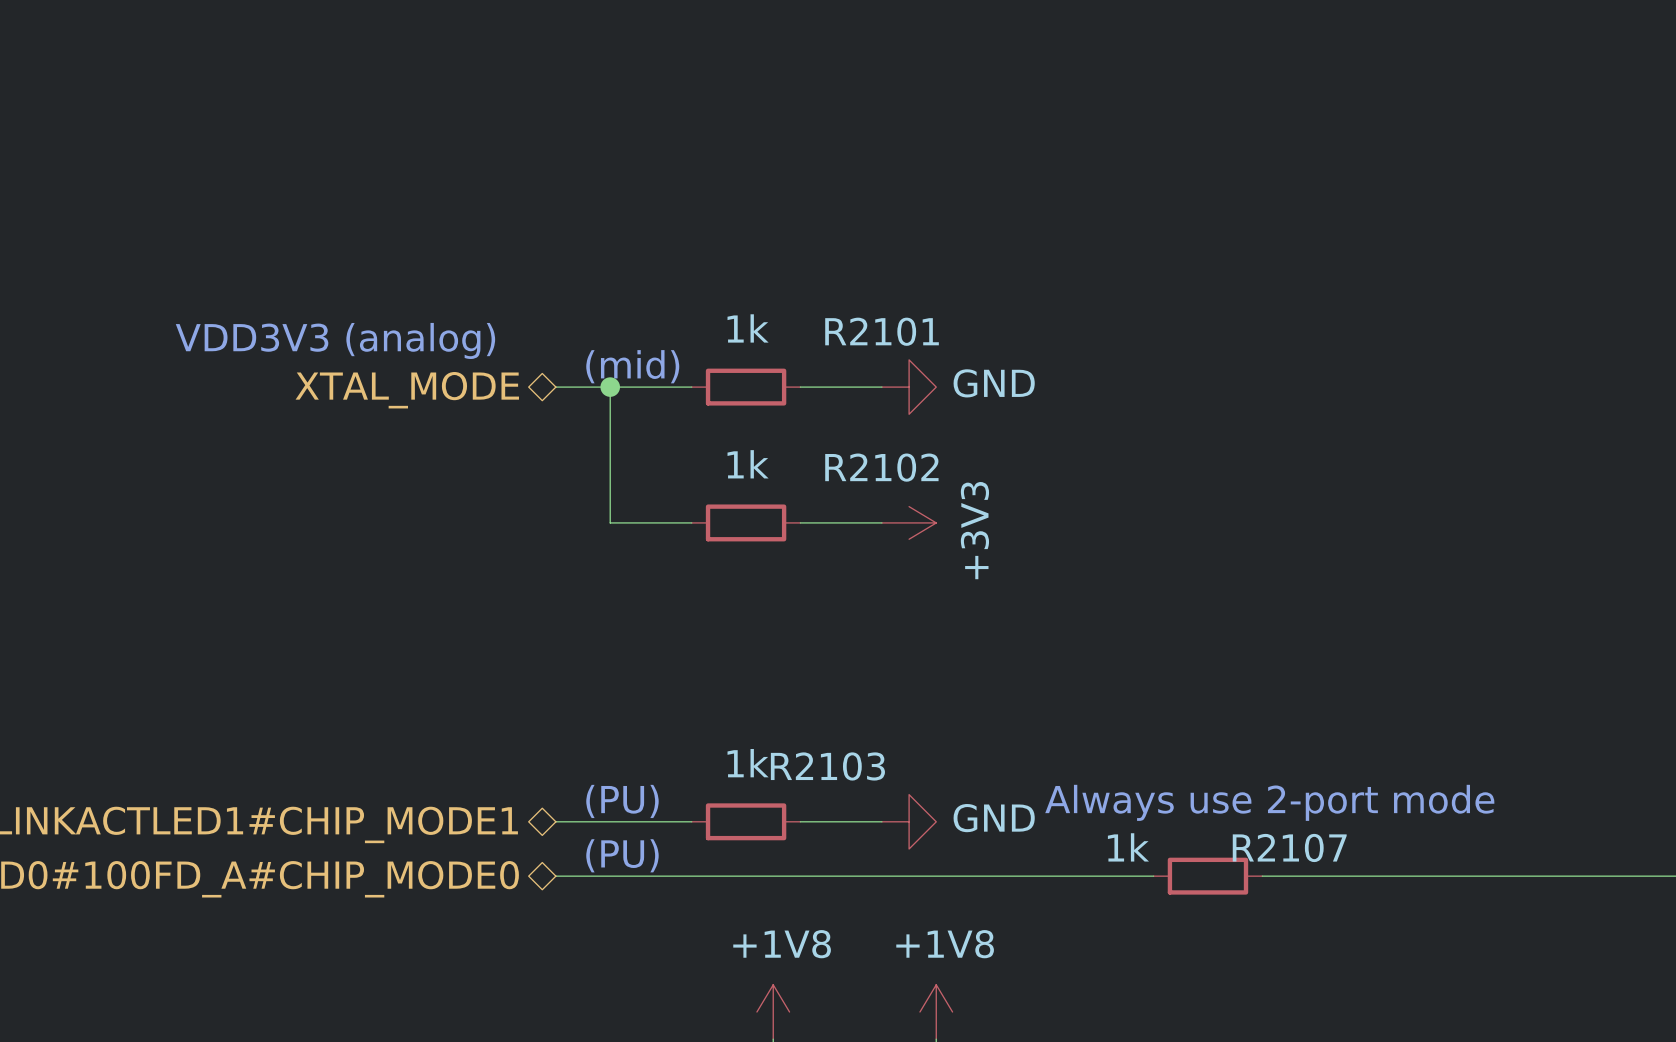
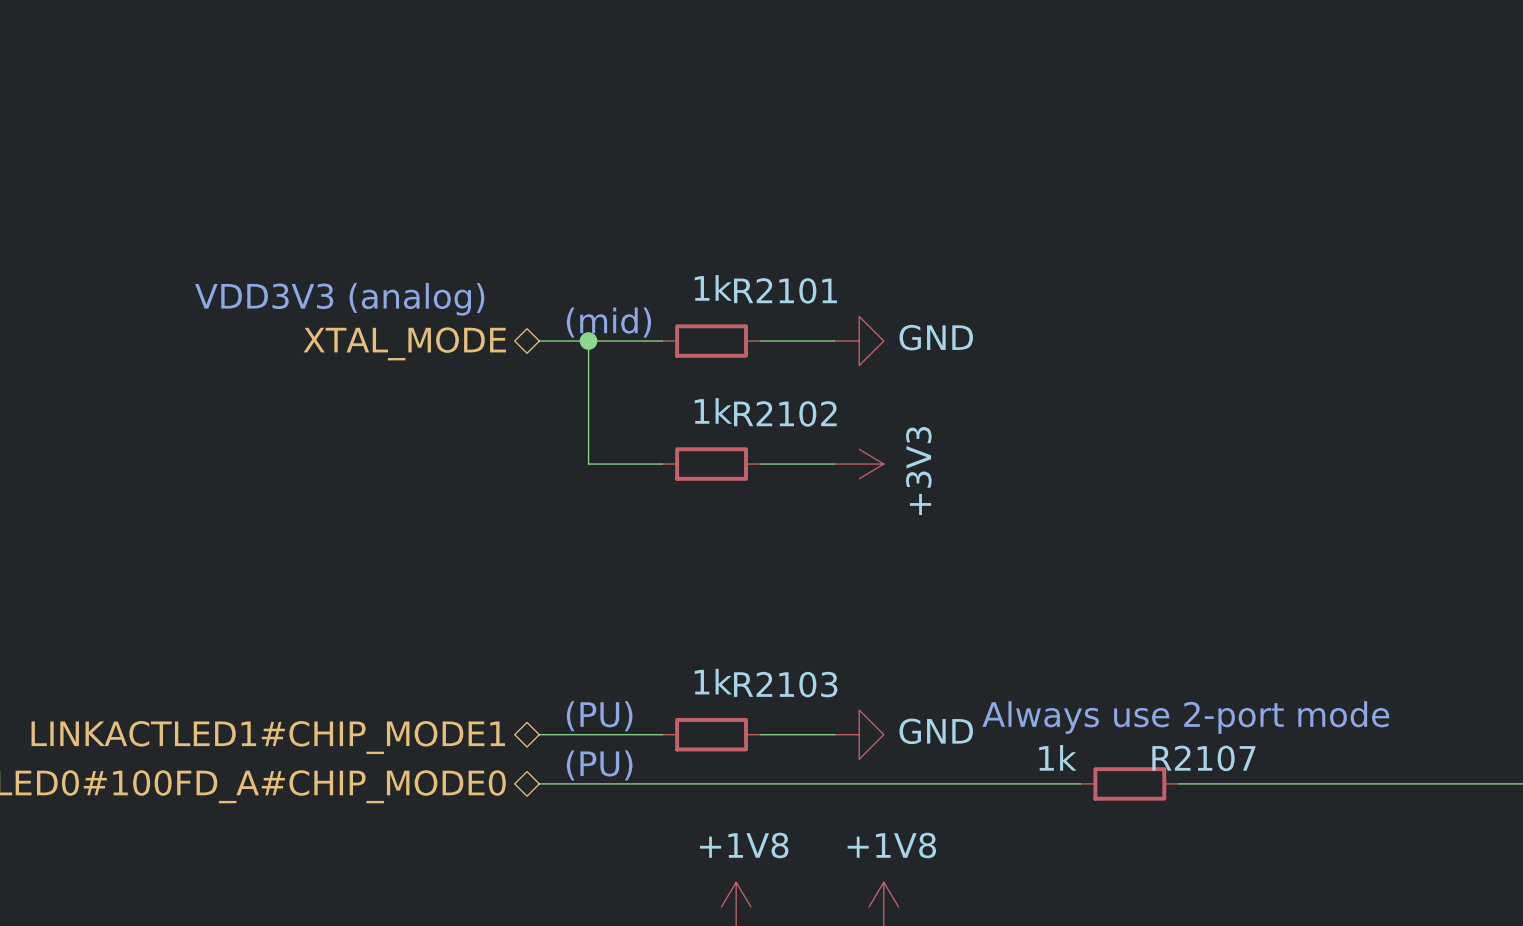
R2101 name position: R2101 (882, 331) -> R2101 (785, 290)
R2102 name position: R2102 (881, 467) -> R2102 (785, 413)

